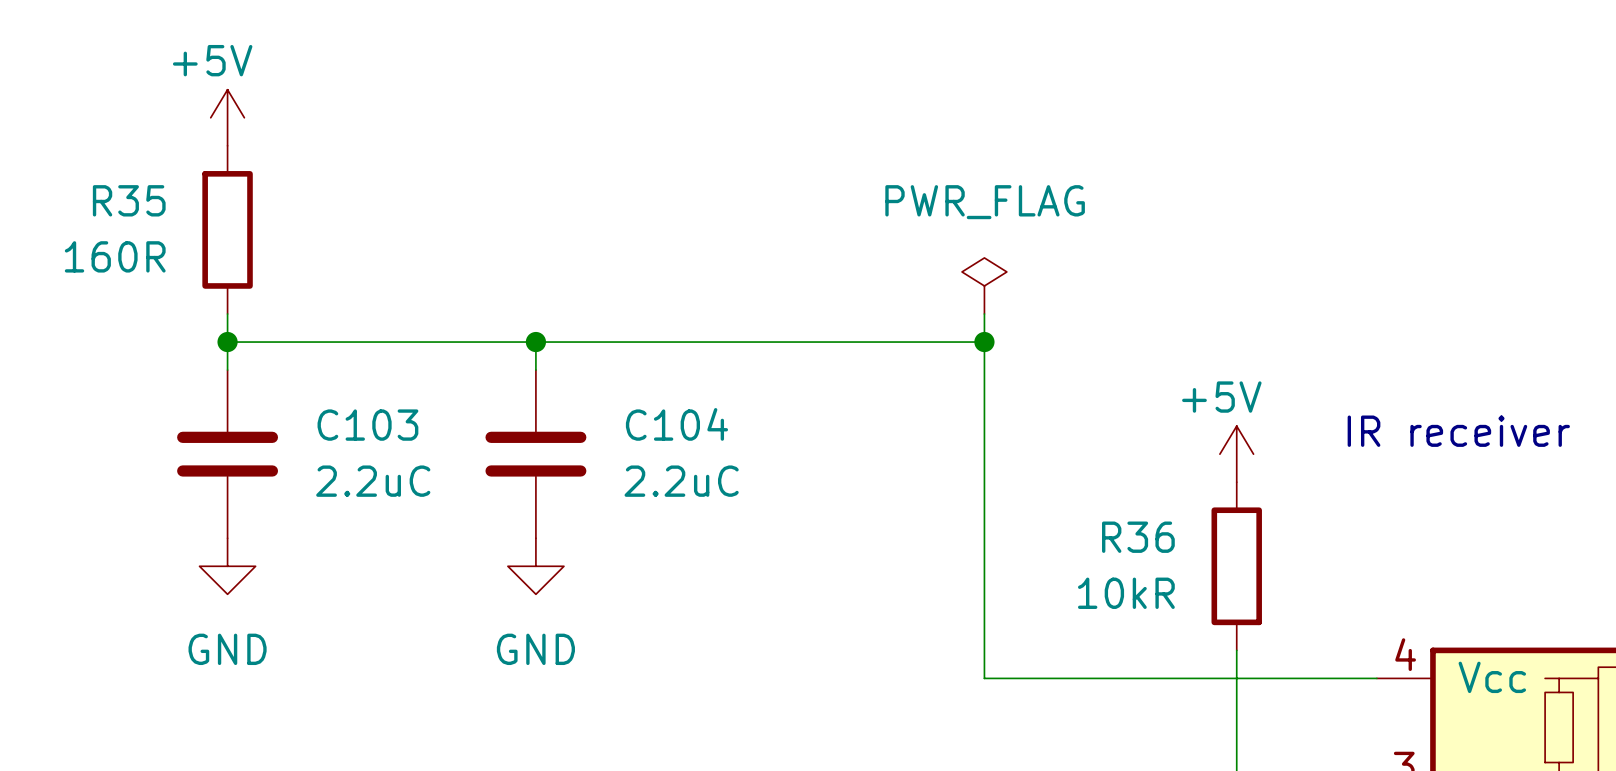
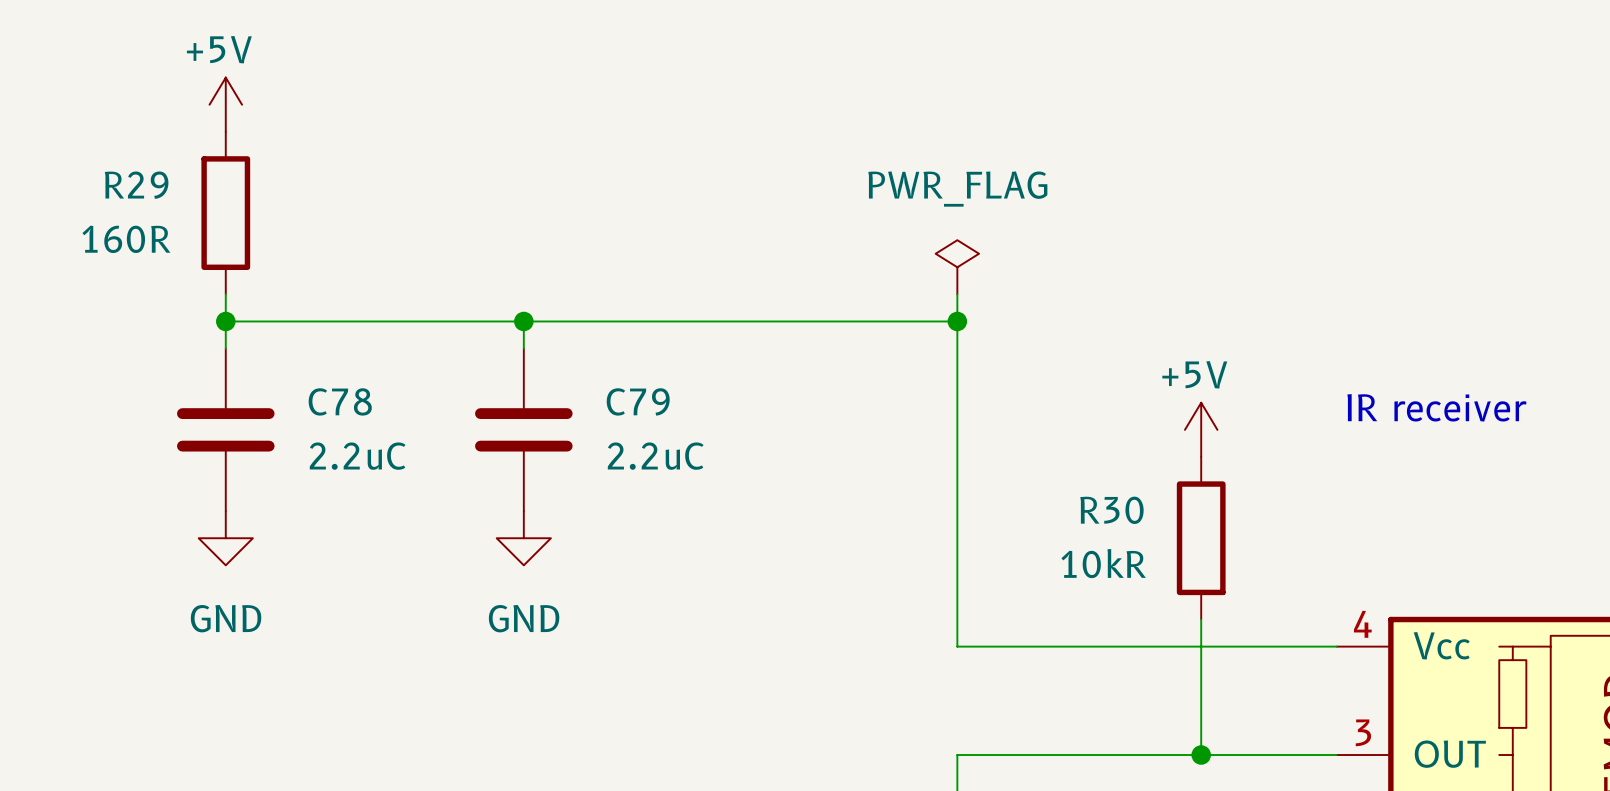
R35 name: R35 (129, 200) -> R29 (136, 185)
C104 name: C104 (676, 424) -> C79 (638, 401)
C103 name: C103 (367, 425) -> C78 (340, 401)
R36 name: R36 (1138, 537) -> R30 (1111, 510)

